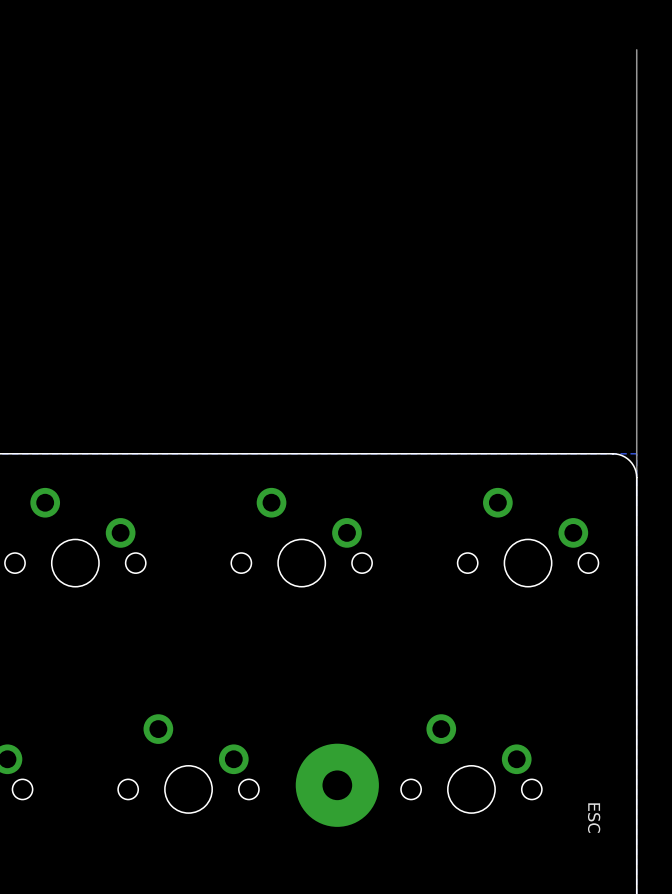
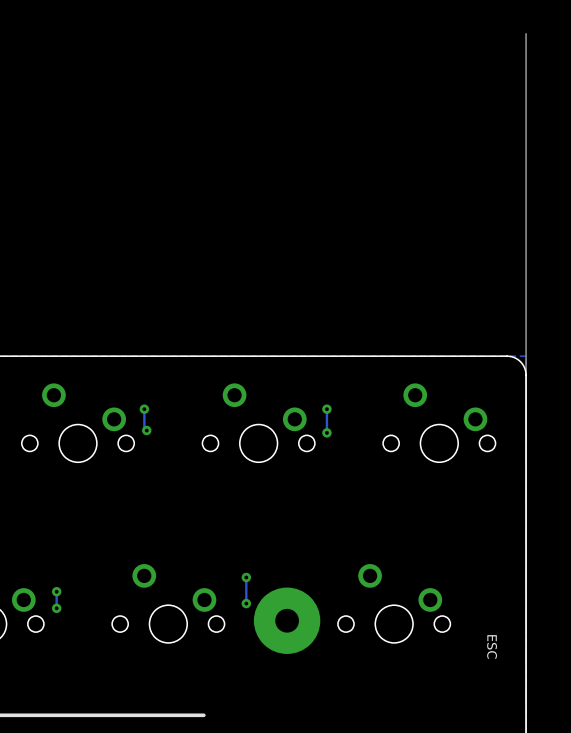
track: none -> (144, 409) (144, 428) (146, 430)
via: none -> (144, 409)
track: none -> (326, 409) (326, 432)
via: none -> (326, 409)
via: none -> (146, 430)
via: none -> (326, 432)
track: none -> (246, 577) (246, 603)
via: none -> (246, 577)
track: none -> (56, 591) (56, 608)
via: none -> (56, 591)
via: none -> (246, 603)
via: none -> (56, 608)

